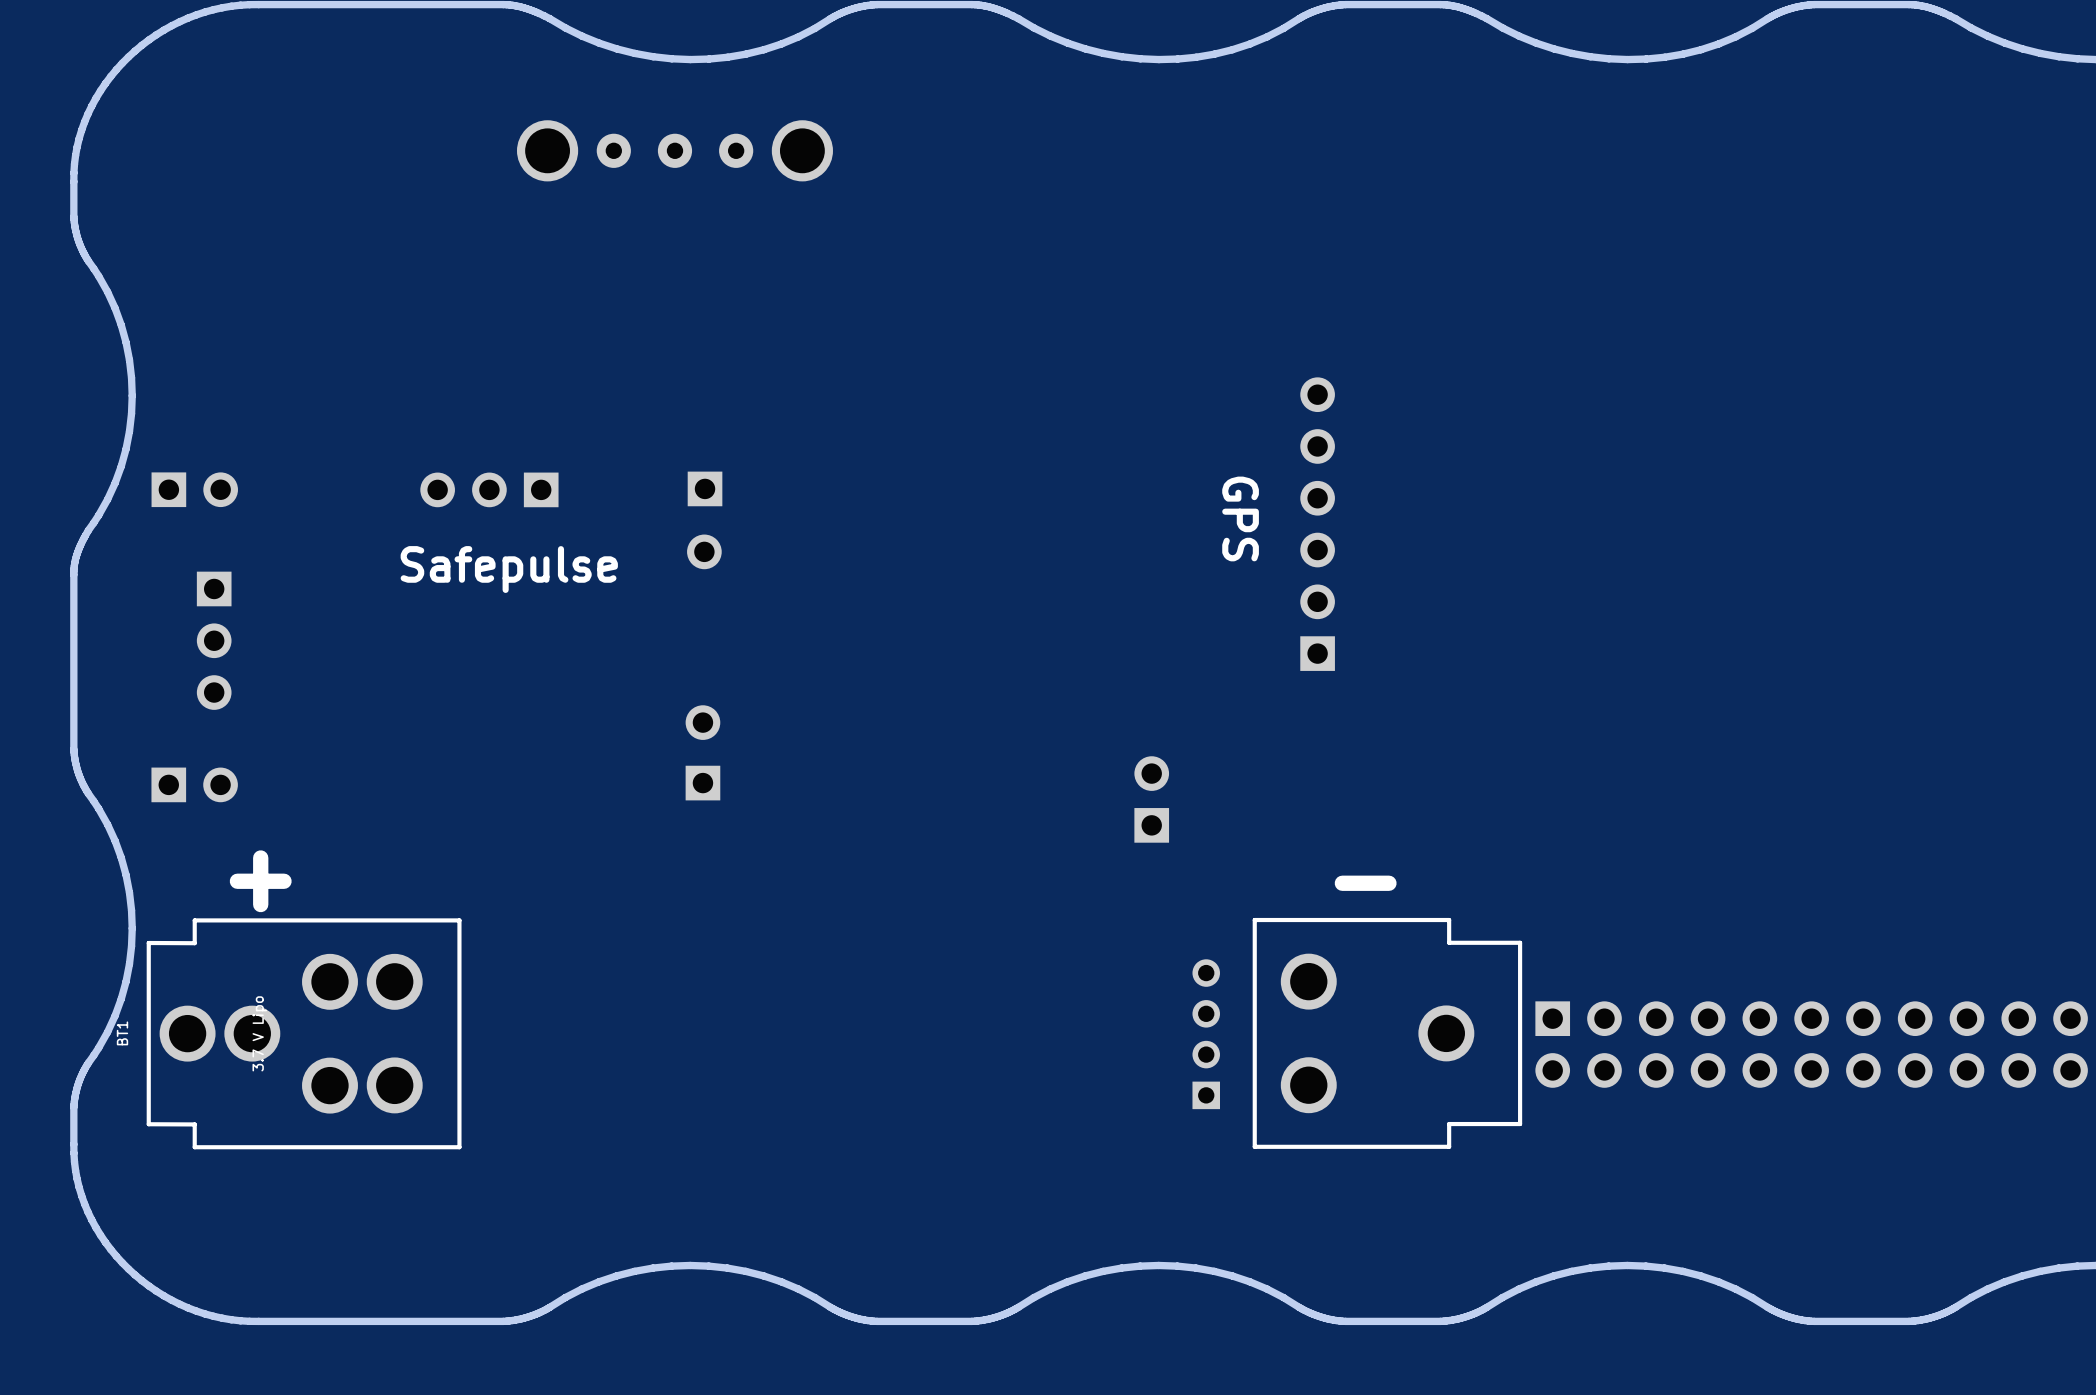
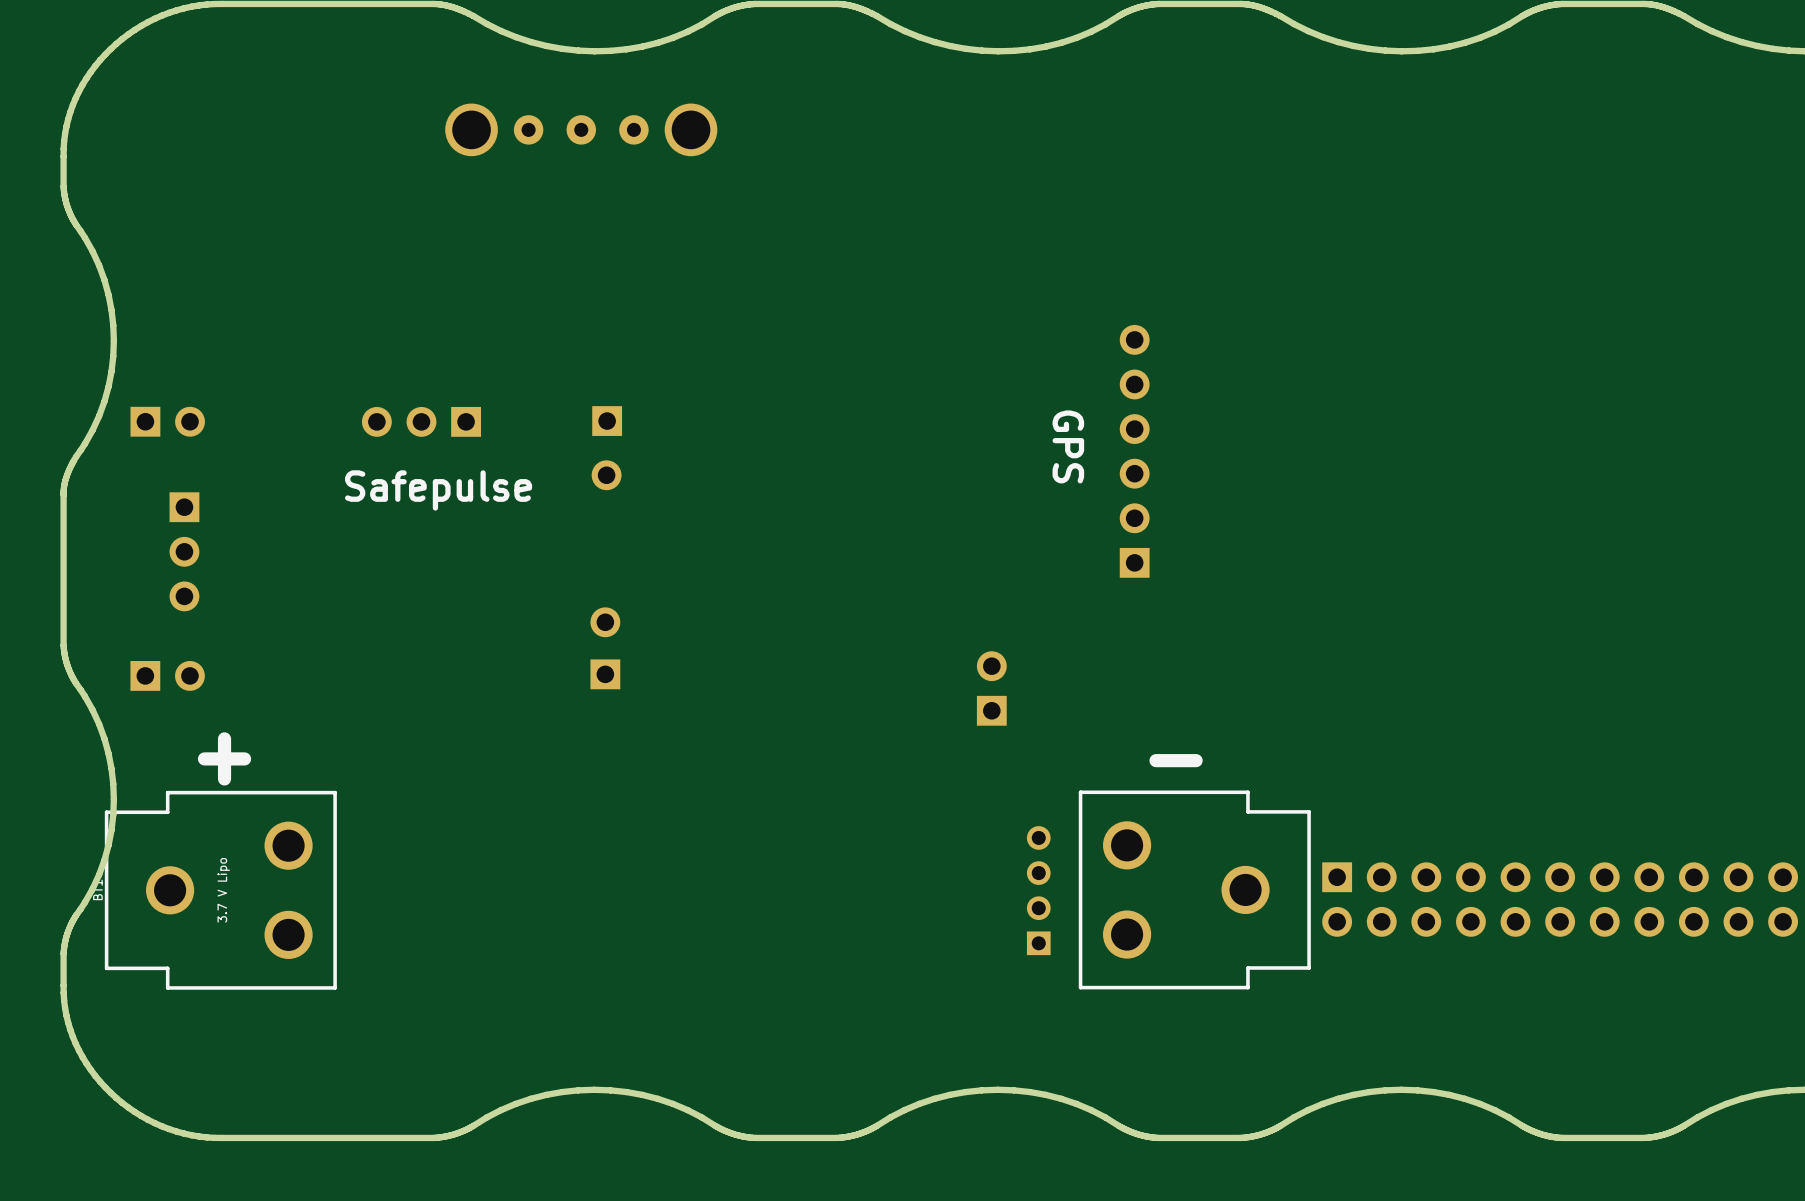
BT1 footprint: [146, 917, 1523, 1150] -> [104, 790, 1311, 990]

